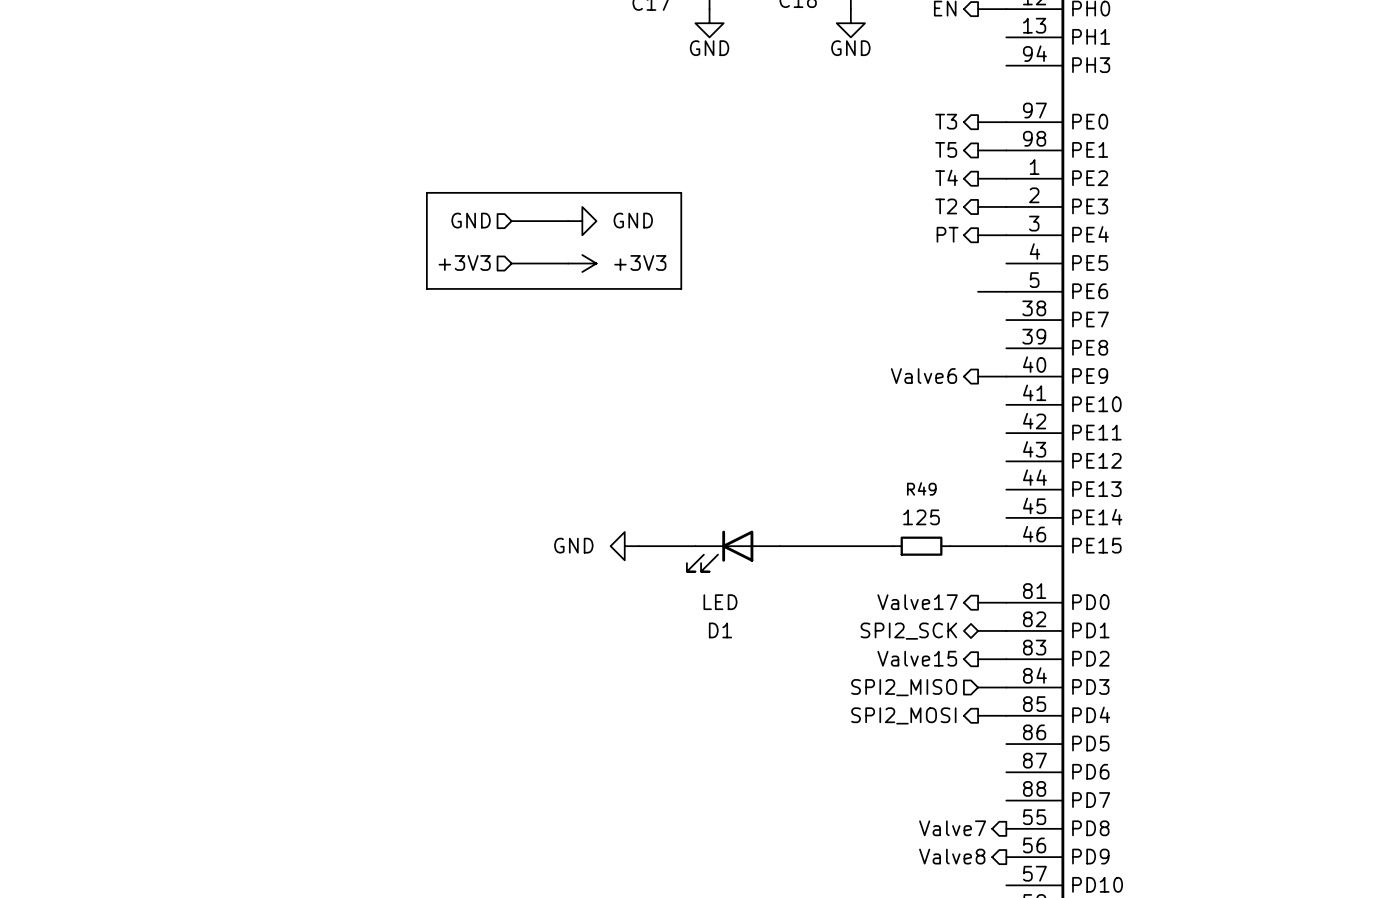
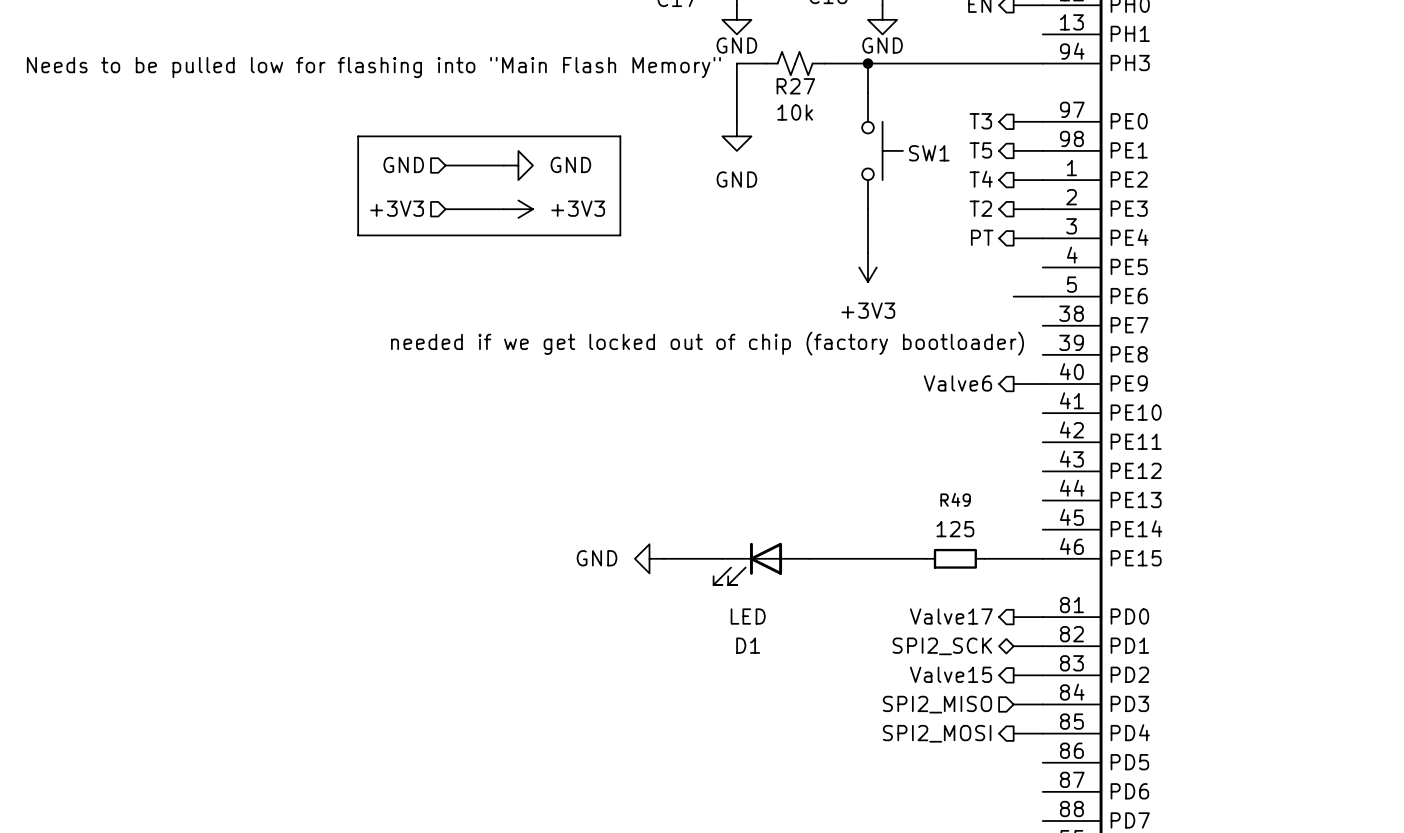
wire: none -> (766, 63) (736, 63) (736, 121)
R27: none -> 10k (795, 63)
wire: none -> (824, 63) (1042, 63)
wire: none -> (867, 63) (867, 92)
junction: none -> (867, 63)
label: none -> Needs to be pulled low for flashing into "Main Flash Memory" (373, 67)
power symbol: none -> GND (736, 136)
SW1: none -> (882, 150)
power symbol: none -> GND (518, 165)
line: (426, 192) (681, 192) (681, 288) (426, 288) (426, 192) -> (358, 136) (620, 136) (620, 235) (358, 235) (358, 136)
wire: none -> (867, 209) (867, 252)
hierarchical label position: GND (471, 220) -> GND (403, 164)
wire: (511, 221) (568, 221) -> (445, 165) (503, 165)
power symbol: GND (582, 221) -> none
hierarchical label position: +3V3 (464, 262) -> +3V3 (397, 208)
wire: (511, 263) (568, 263) -> (445, 209) (503, 209)
power symbol position: +3V3 (582, 263) -> +3V3 (518, 209)
power symbol: none -> +3V3 (867, 267)
label: none -> needed if we get locked out of chip (factory bootloader) (707, 343)

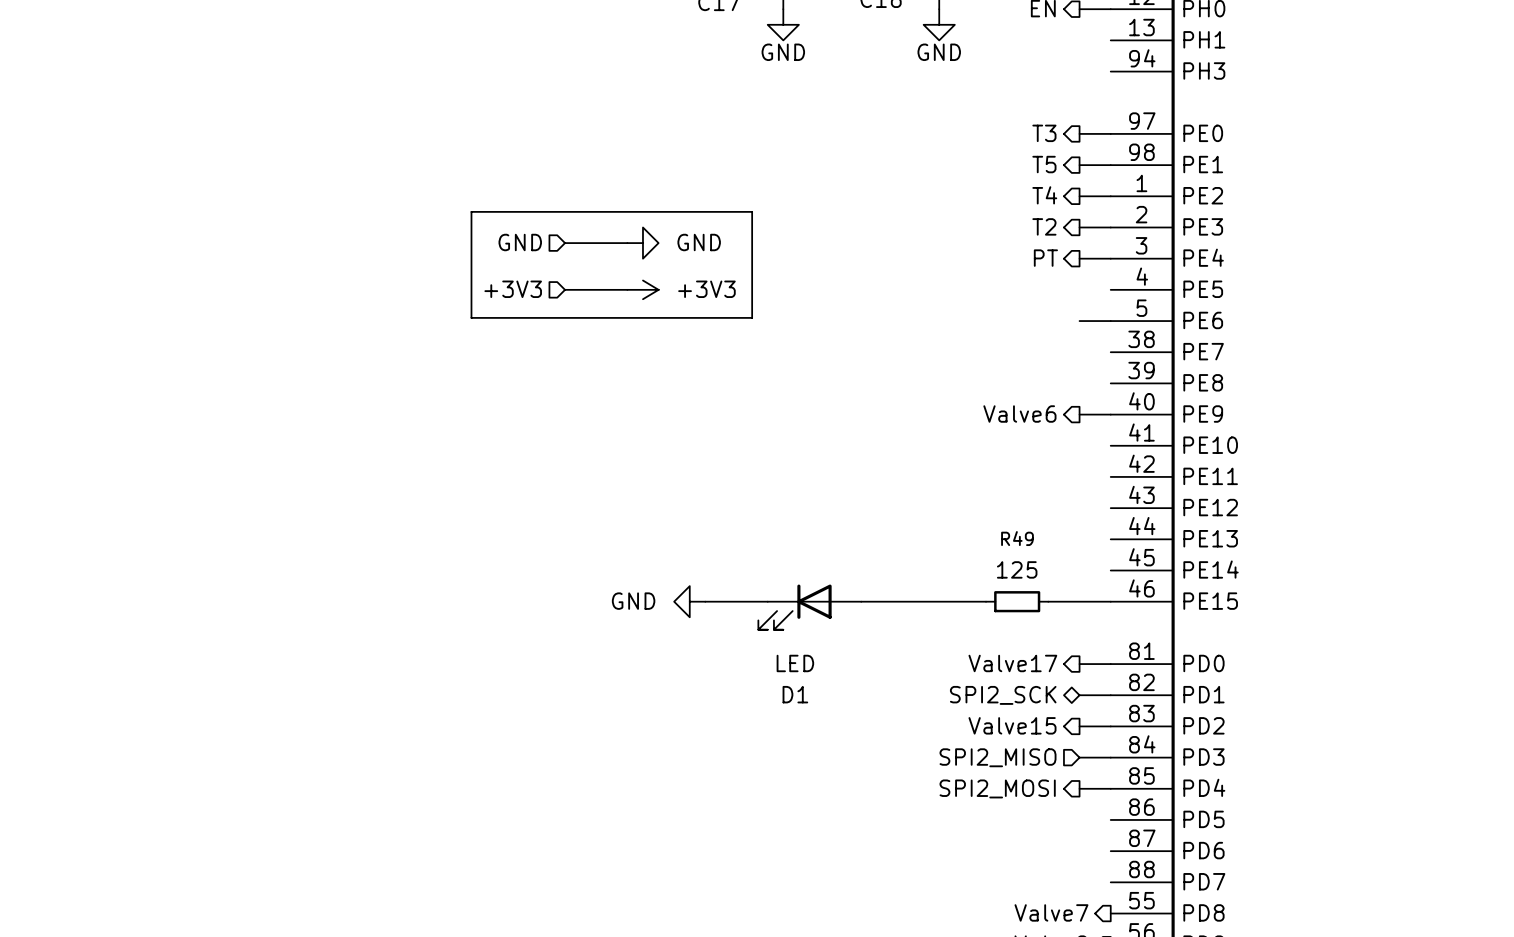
wire: (766, 63) (736, 63) (736, 121) -> none
R27: 10k (795, 63) -> none
wire: (824, 63) (1042, 63) -> none
wire: (867, 63) (867, 92) -> none
junction: (867, 63) -> none
label: Needs to be pulled low for flashing into "Main Flash Memory" (373, 67) -> none
line: (358, 136) (620, 136) (620, 235) (358, 235) (358, 136) -> (471, 211) (752, 211) (752, 317) (471, 317) (471, 211)
power symbol: GND (736, 136) -> none
SW1: (882, 150) -> none
hierarchical label position: GND (403, 164) -> GND (520, 242)
wire: (445, 165) (503, 165) -> (565, 243) (627, 243)
power symbol: GND (518, 165) -> none
hierarchical label position: +3V3 (397, 208) -> +3V3 (513, 289)
wire: (445, 209) (503, 209) -> (565, 289) (627, 289)
power symbol position: +3V3 (518, 209) -> +3V3 (642, 289)
wire: (867, 209) (867, 252) -> none
power symbol: none -> GND (642, 243)
power symbol: +3V3 (867, 267) -> none
label: needed if we get locked out of chip (factory bootloader) (707, 343) -> none

